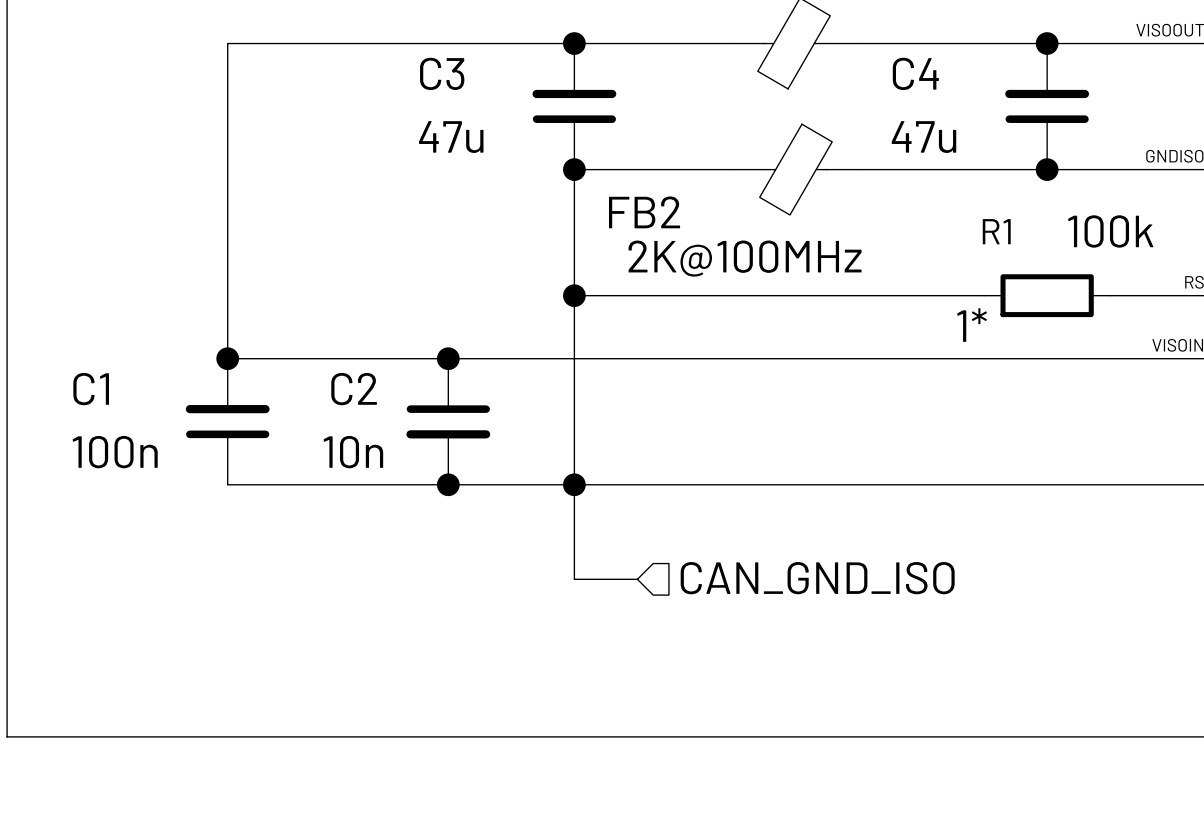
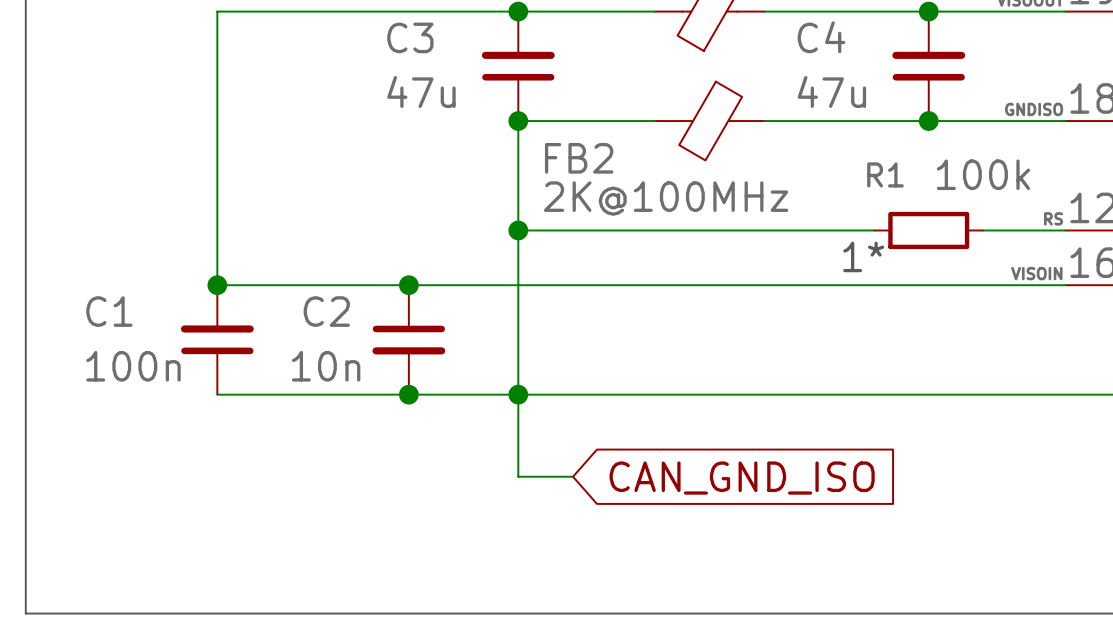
hierarchical label: CAN_GND_ISO (817, 578) -> none
global label: none -> CAN_GND_ISO (742, 478)

